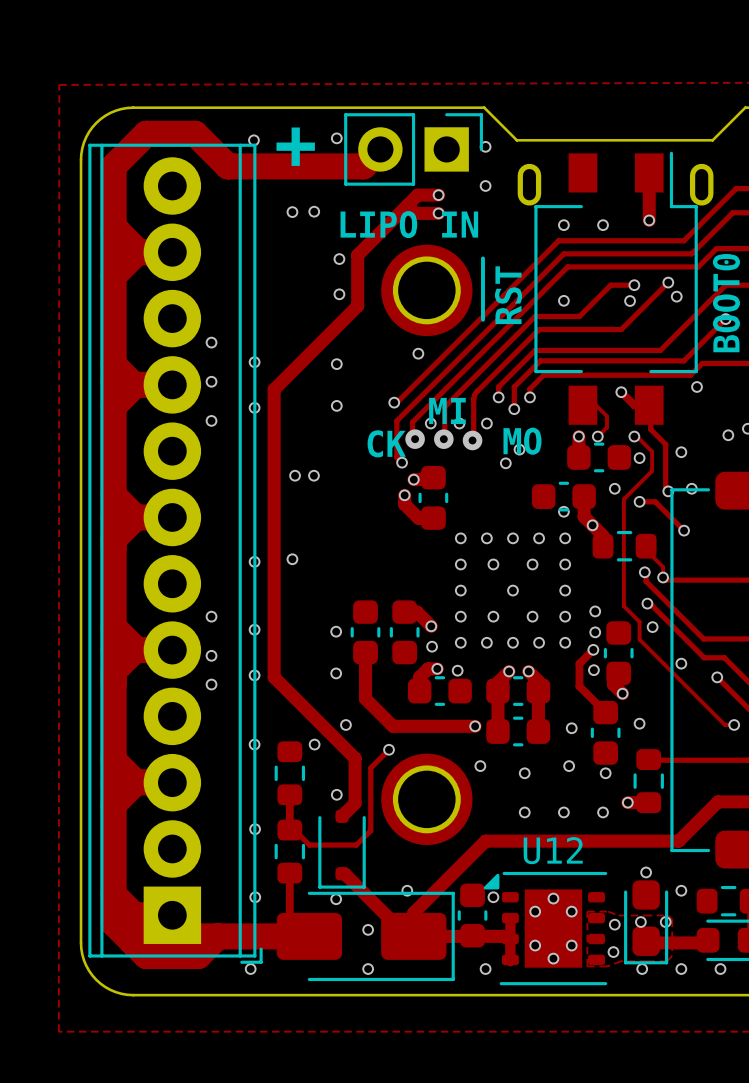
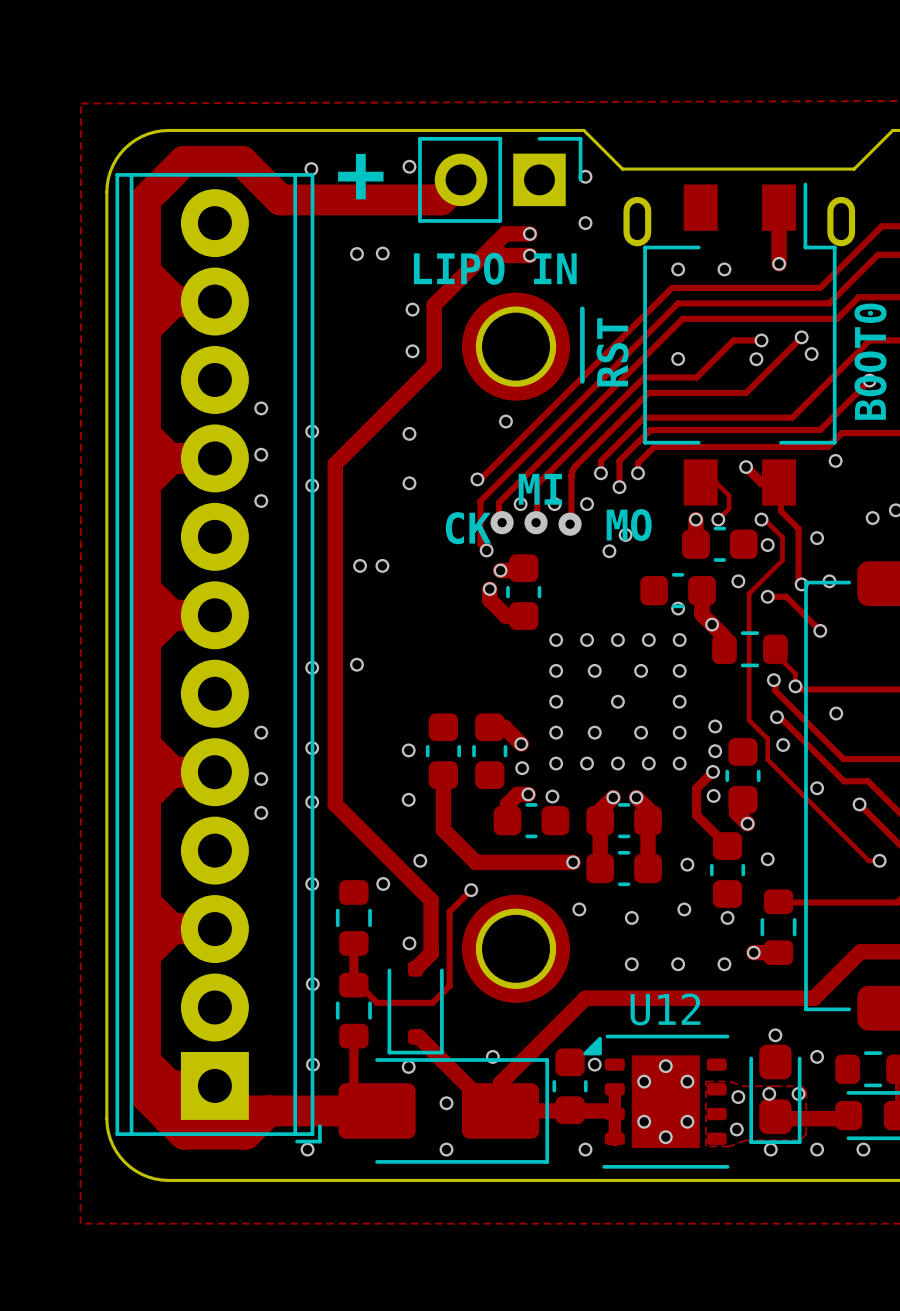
via: none -> (836, 713)

